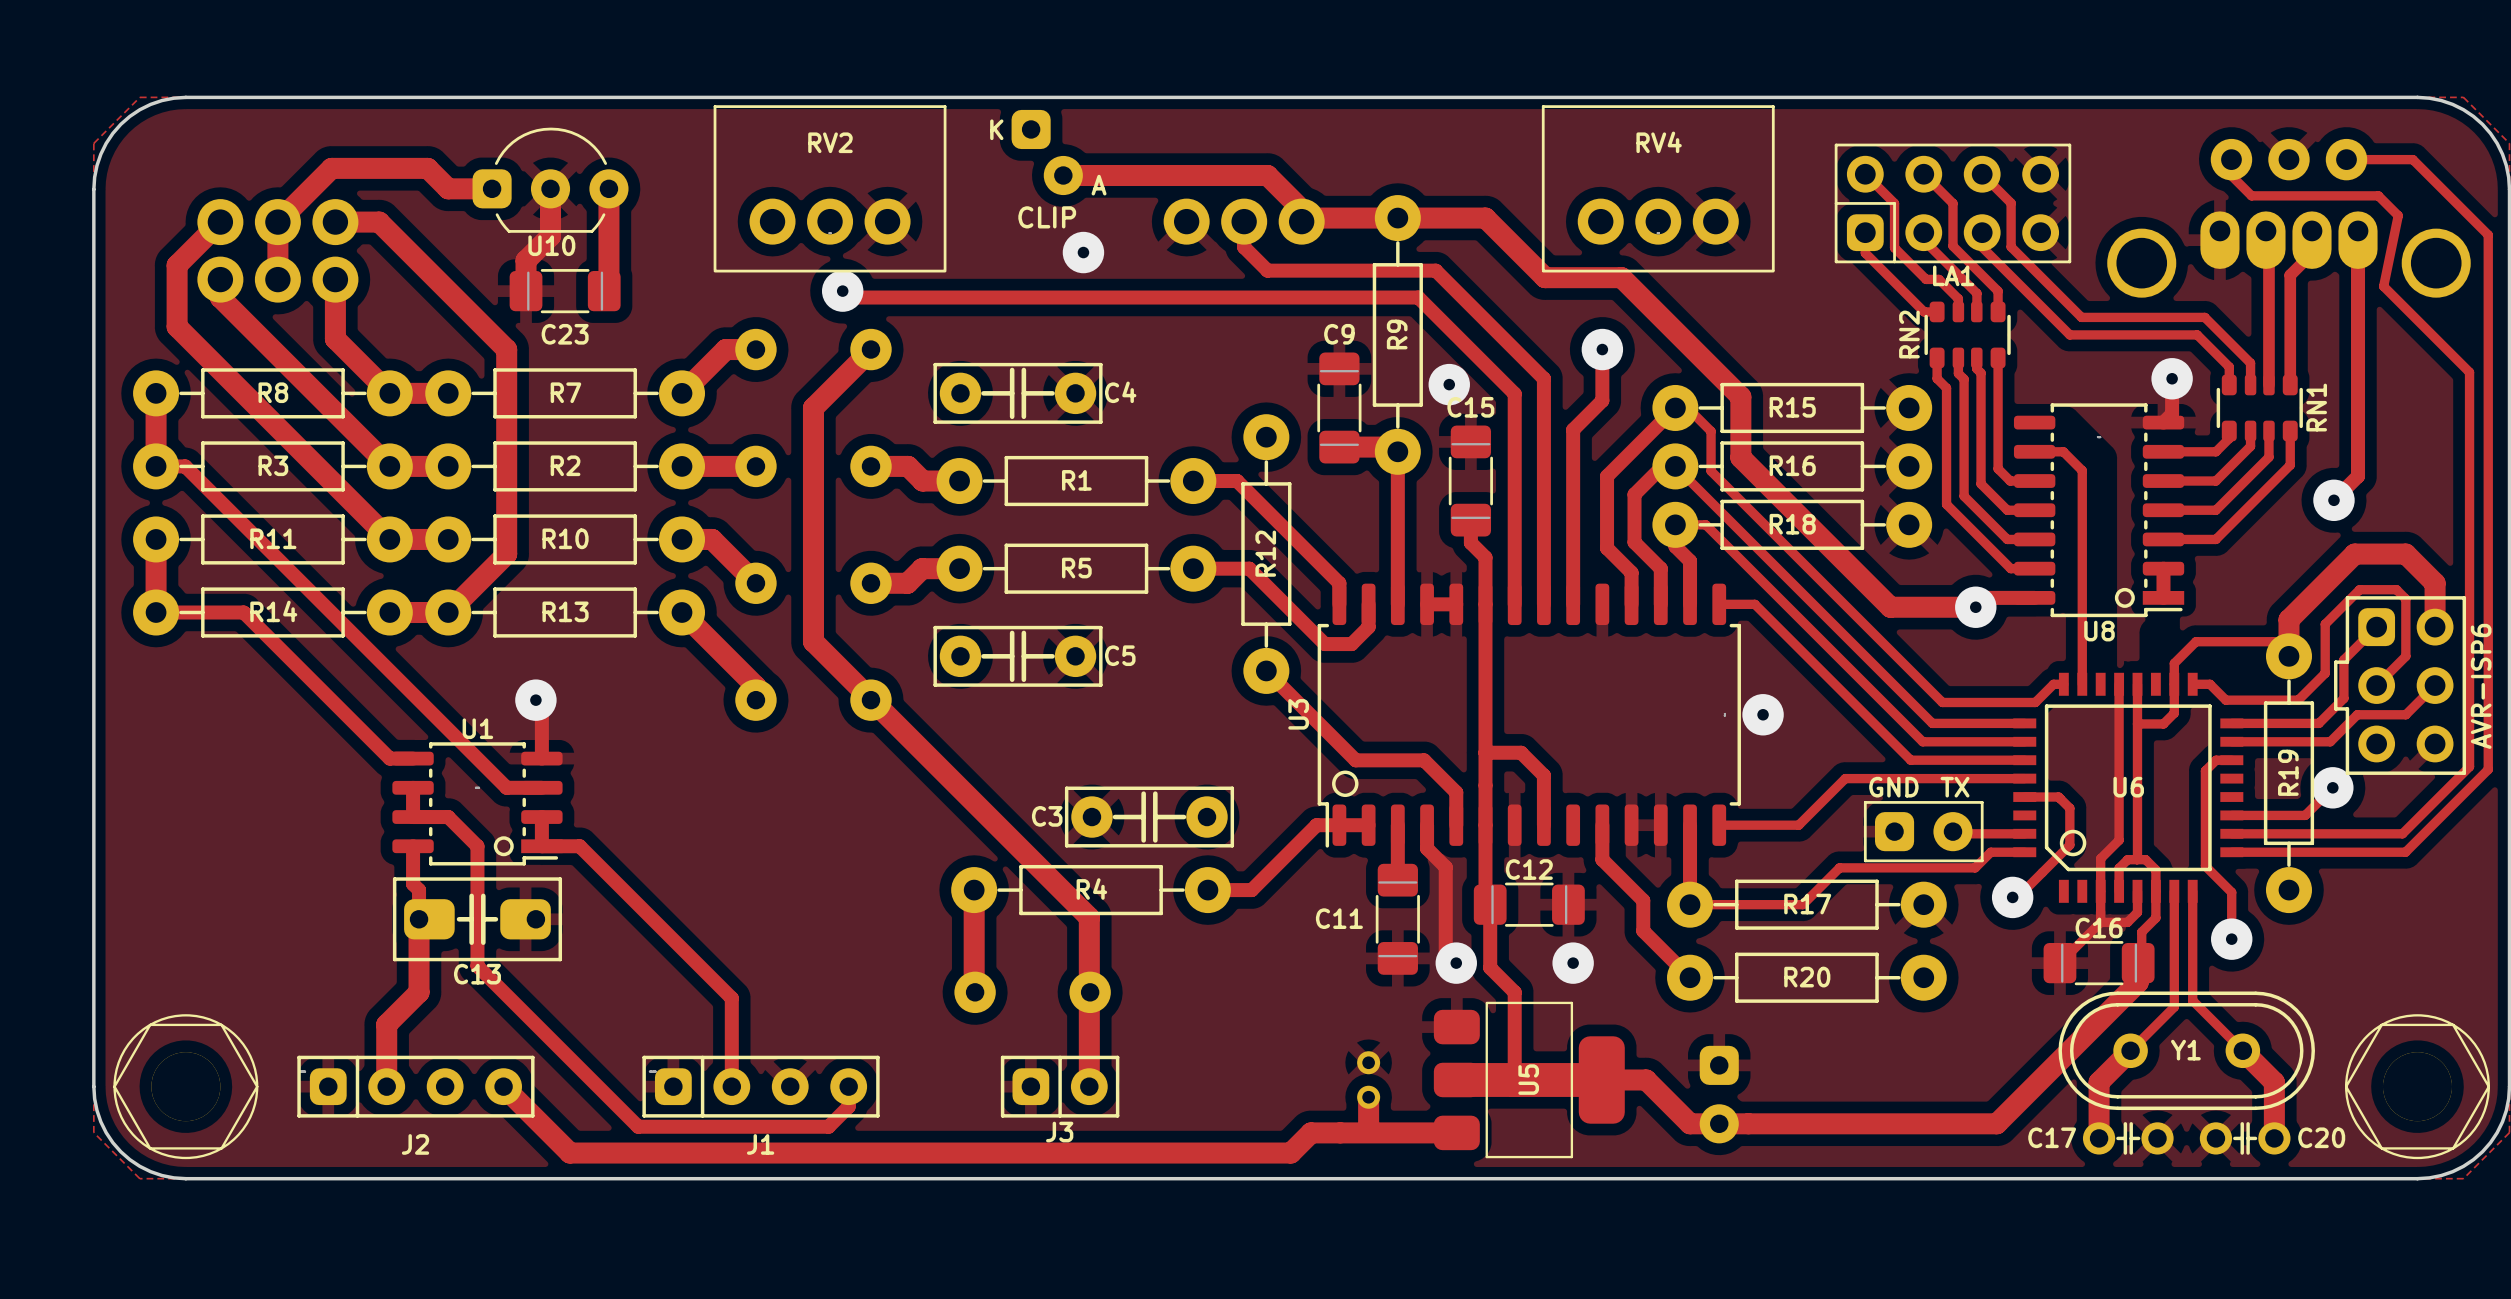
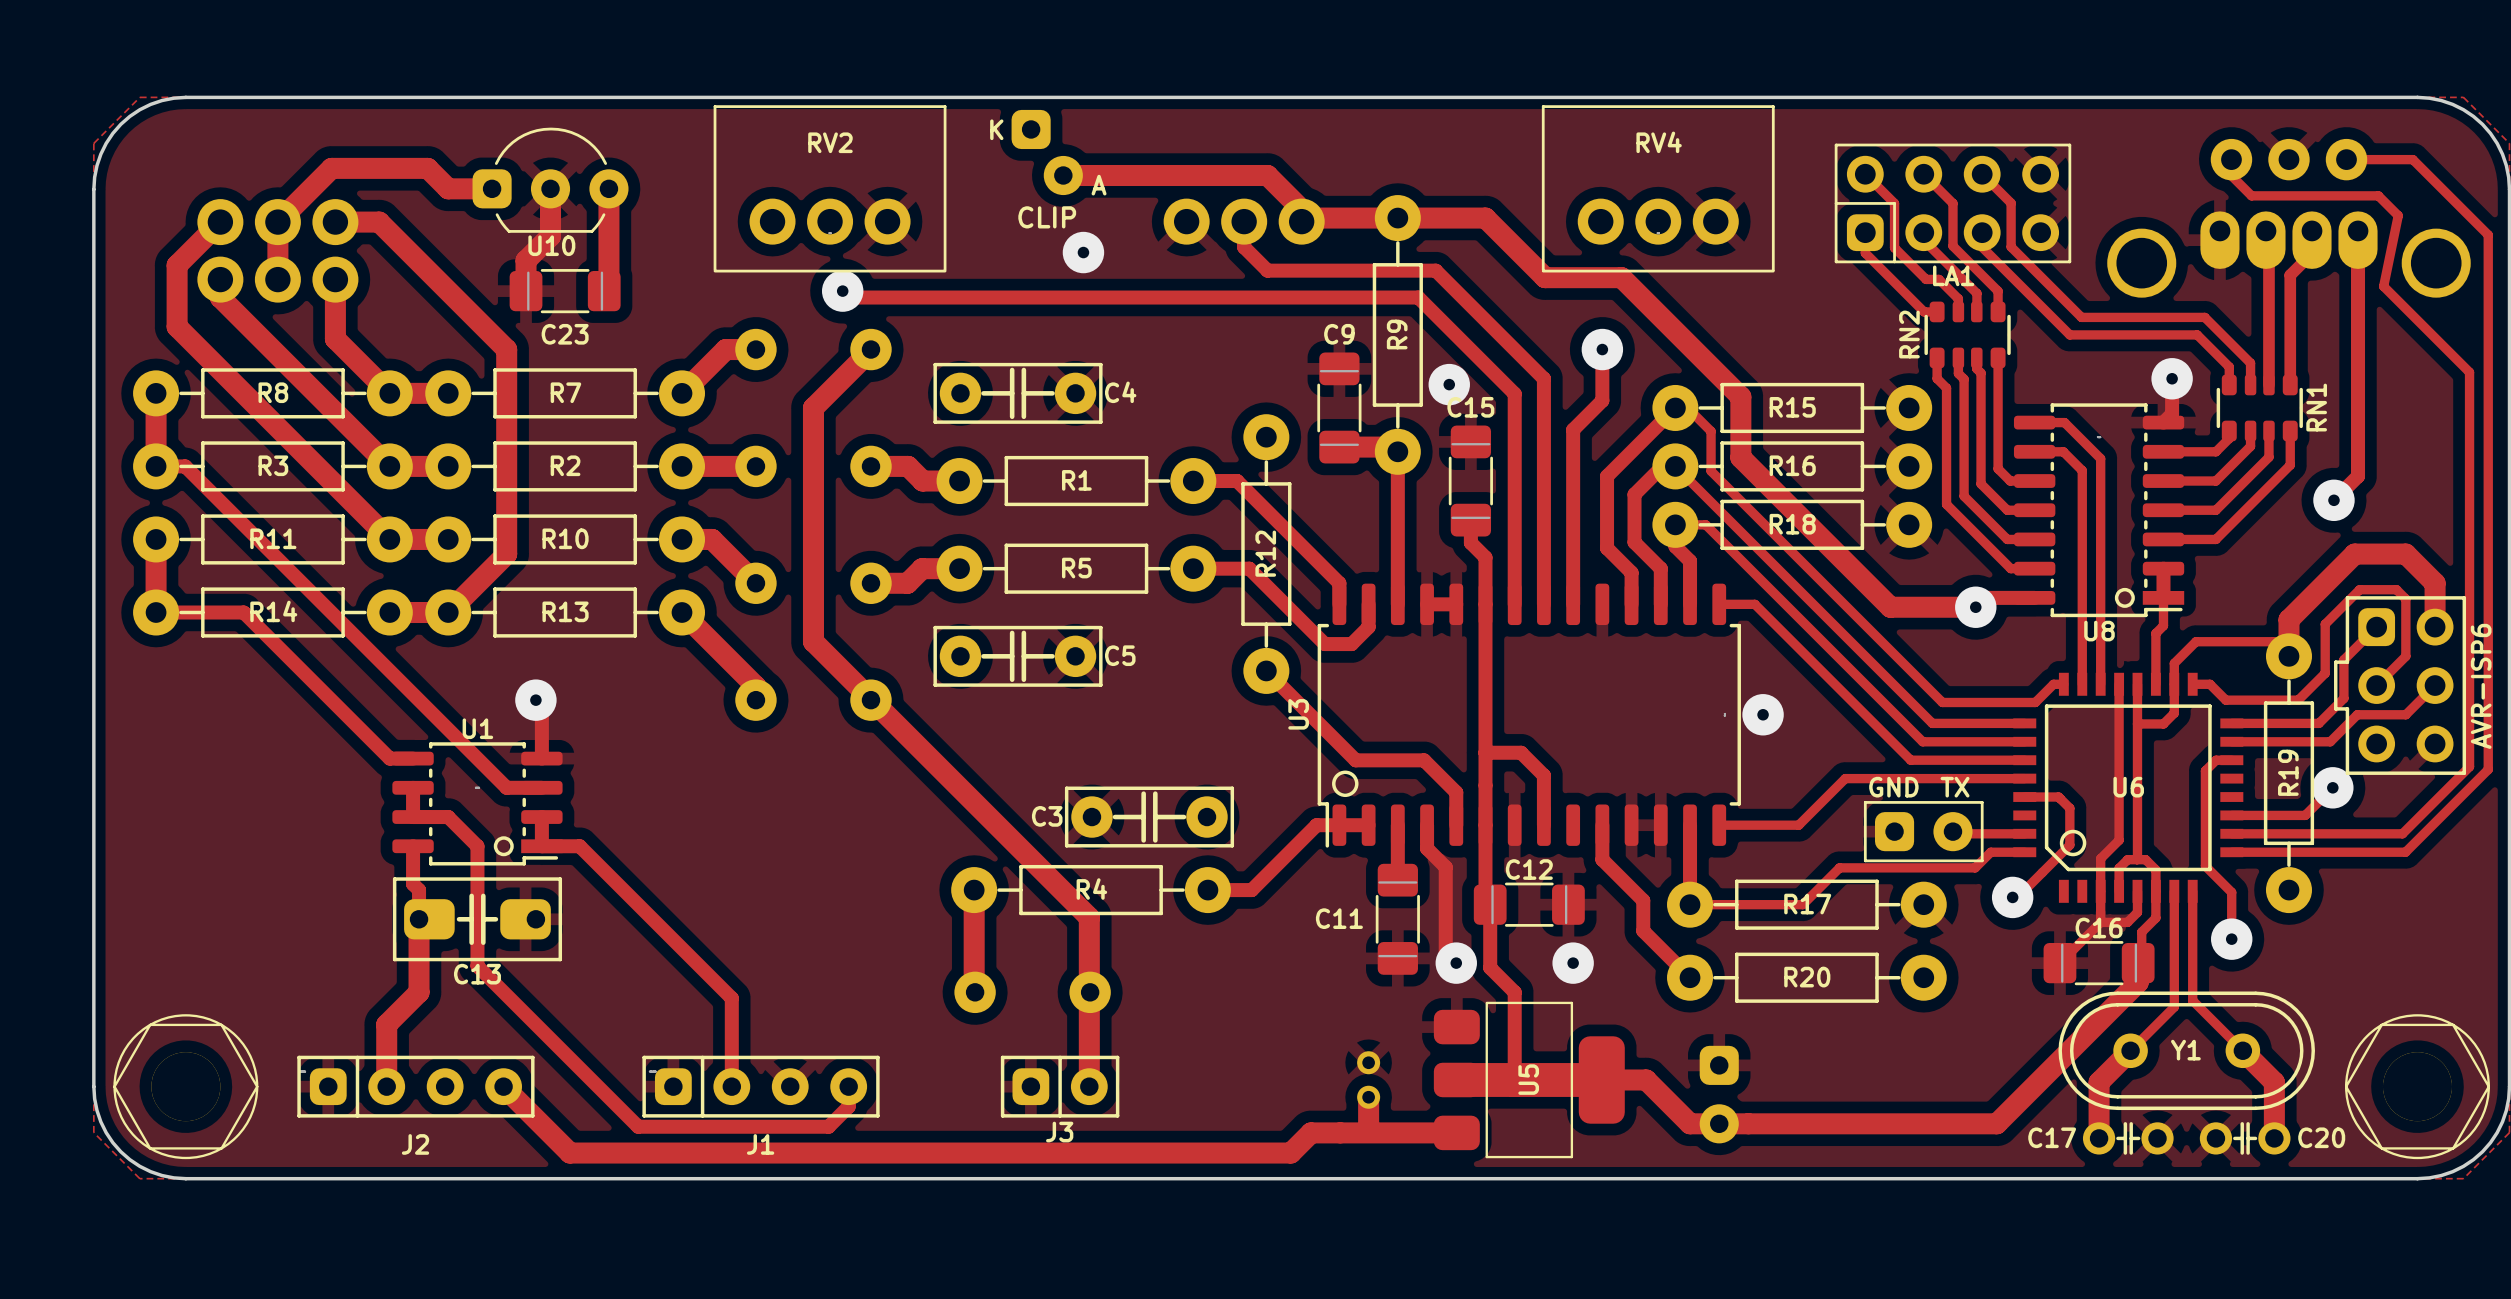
track: none -> (2034, 422) (2064, 422) (2100, 458) (2100, 684)
track: none -> (2163, 597) (2163, 625) (2155, 633) (2155, 684)

